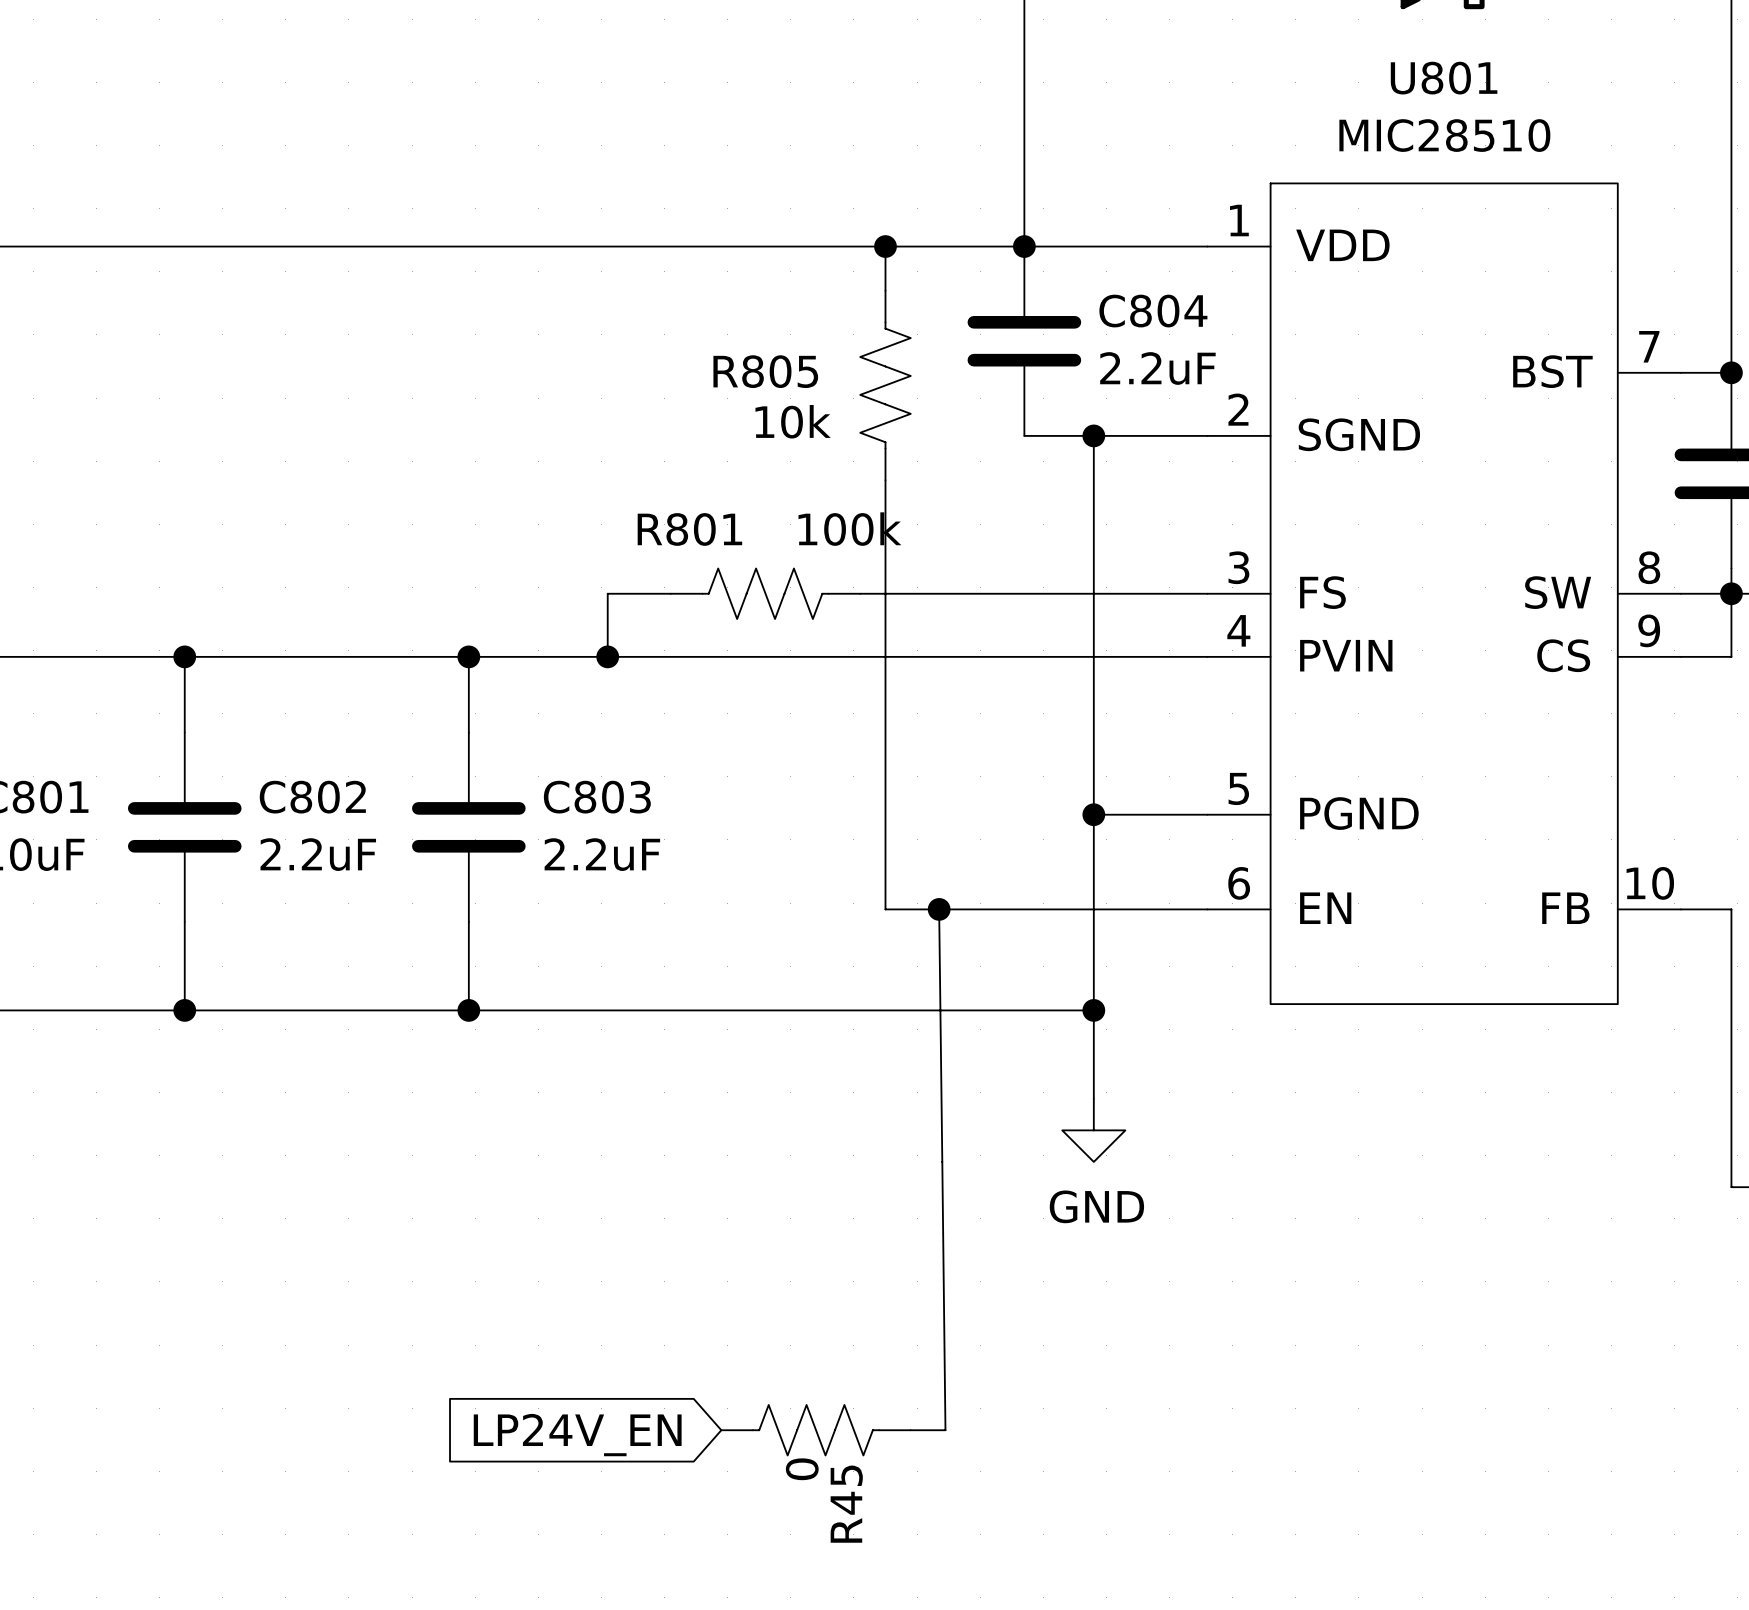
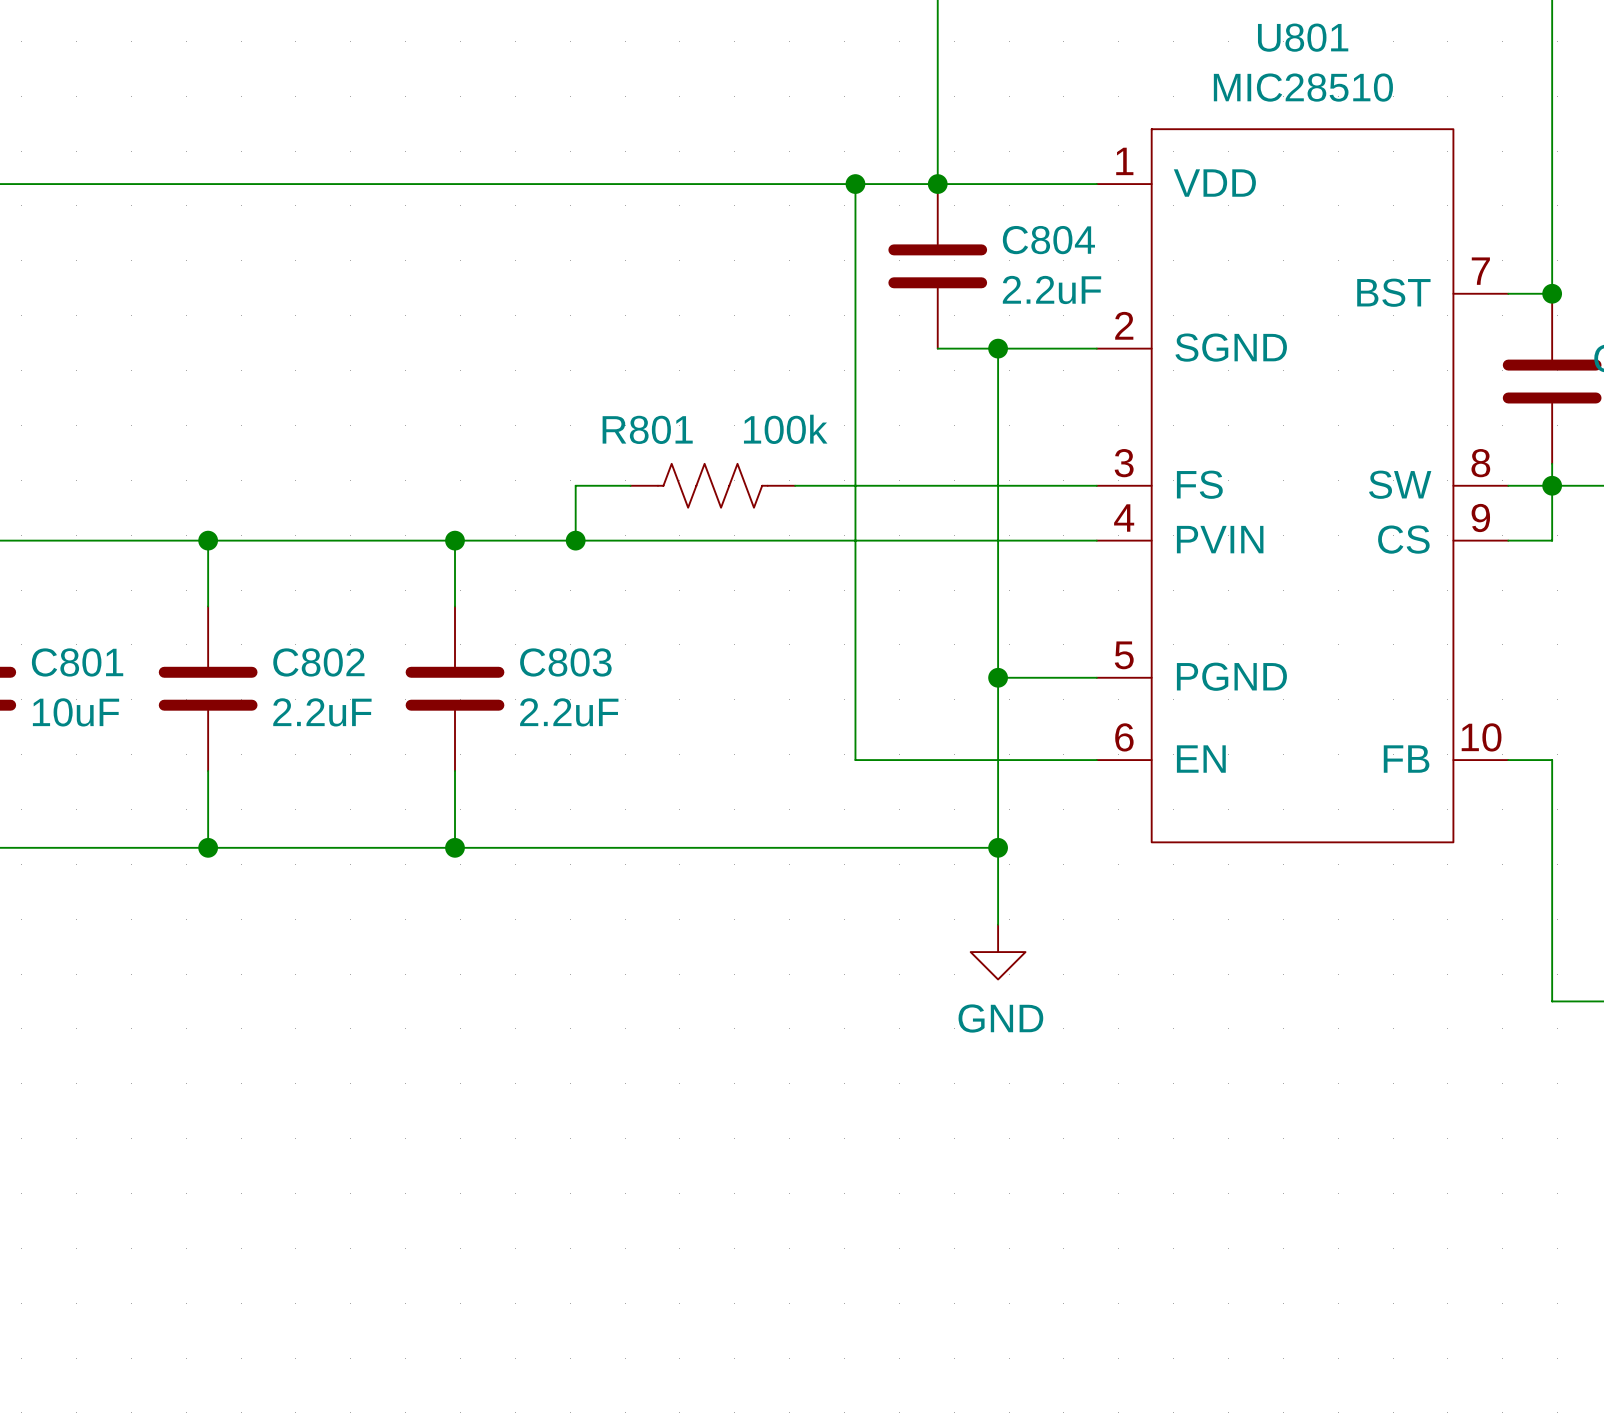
wire: (885, 246) (885, 290) -> none
junction position: (885, 246) -> (855, 184)
R805: 10k (885, 385) -> none
wire: (885, 480) (885, 909) (929, 909) -> (855, 184) (855, 760)
wire: (939, 909) (945, 1430) (910, 1430) -> none
junction: (939, 909) -> none
R45: 0 (816, 1430) -> none
global label: LP24V_EN (577, 1435) -> none

